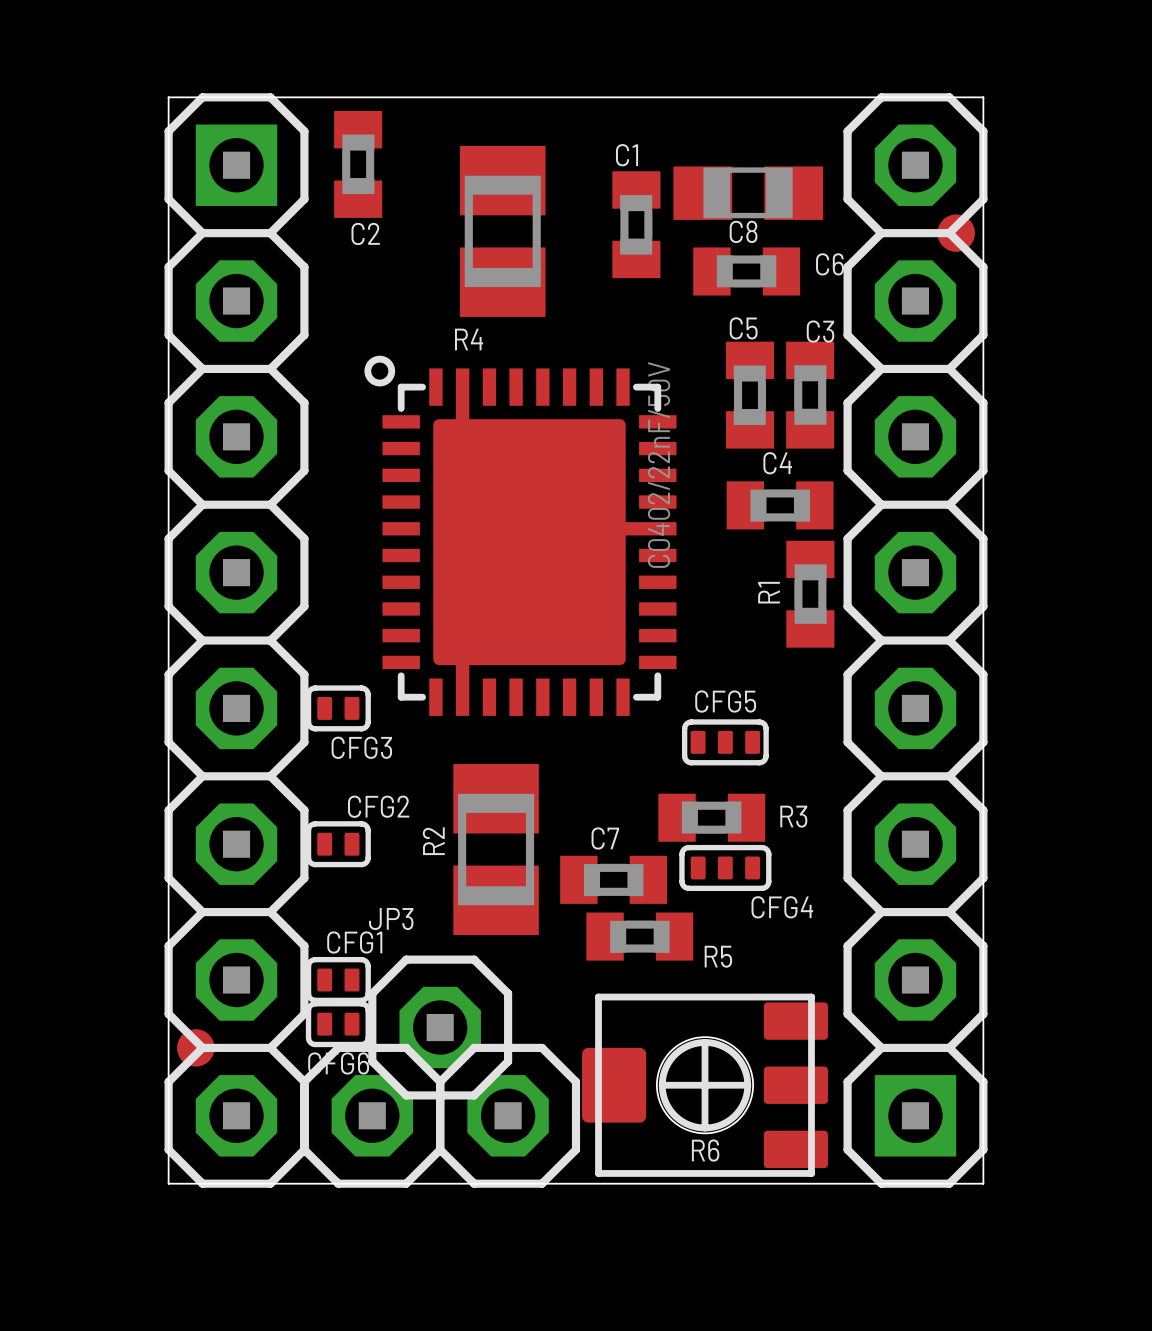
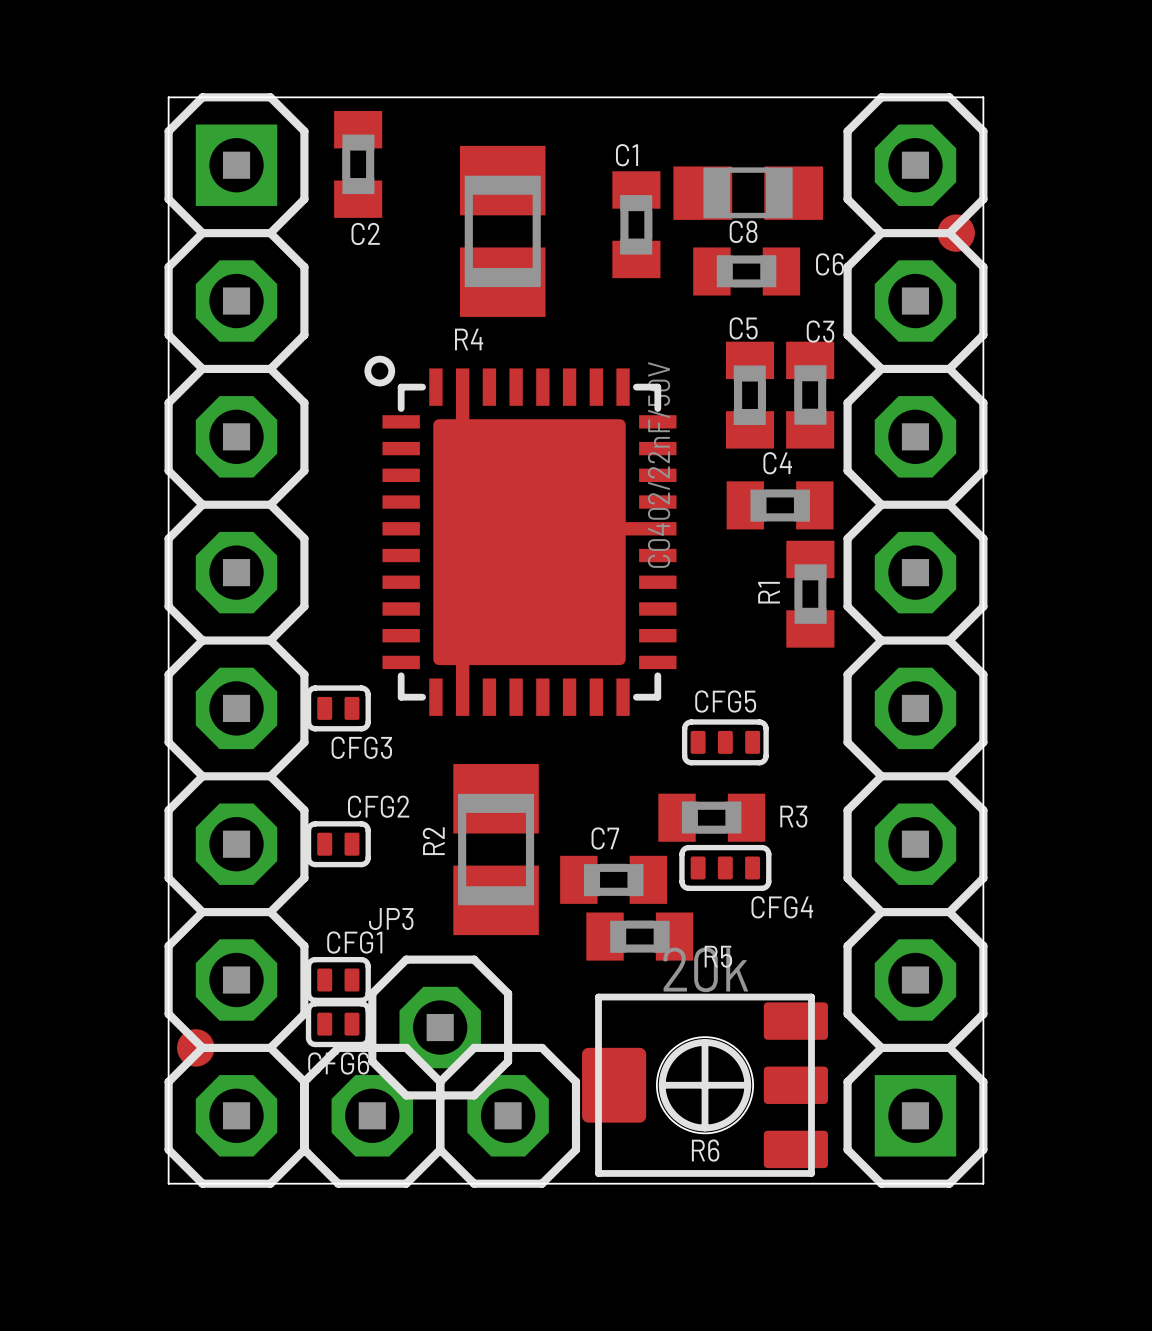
R6 value: none -> 20k (705, 969)

